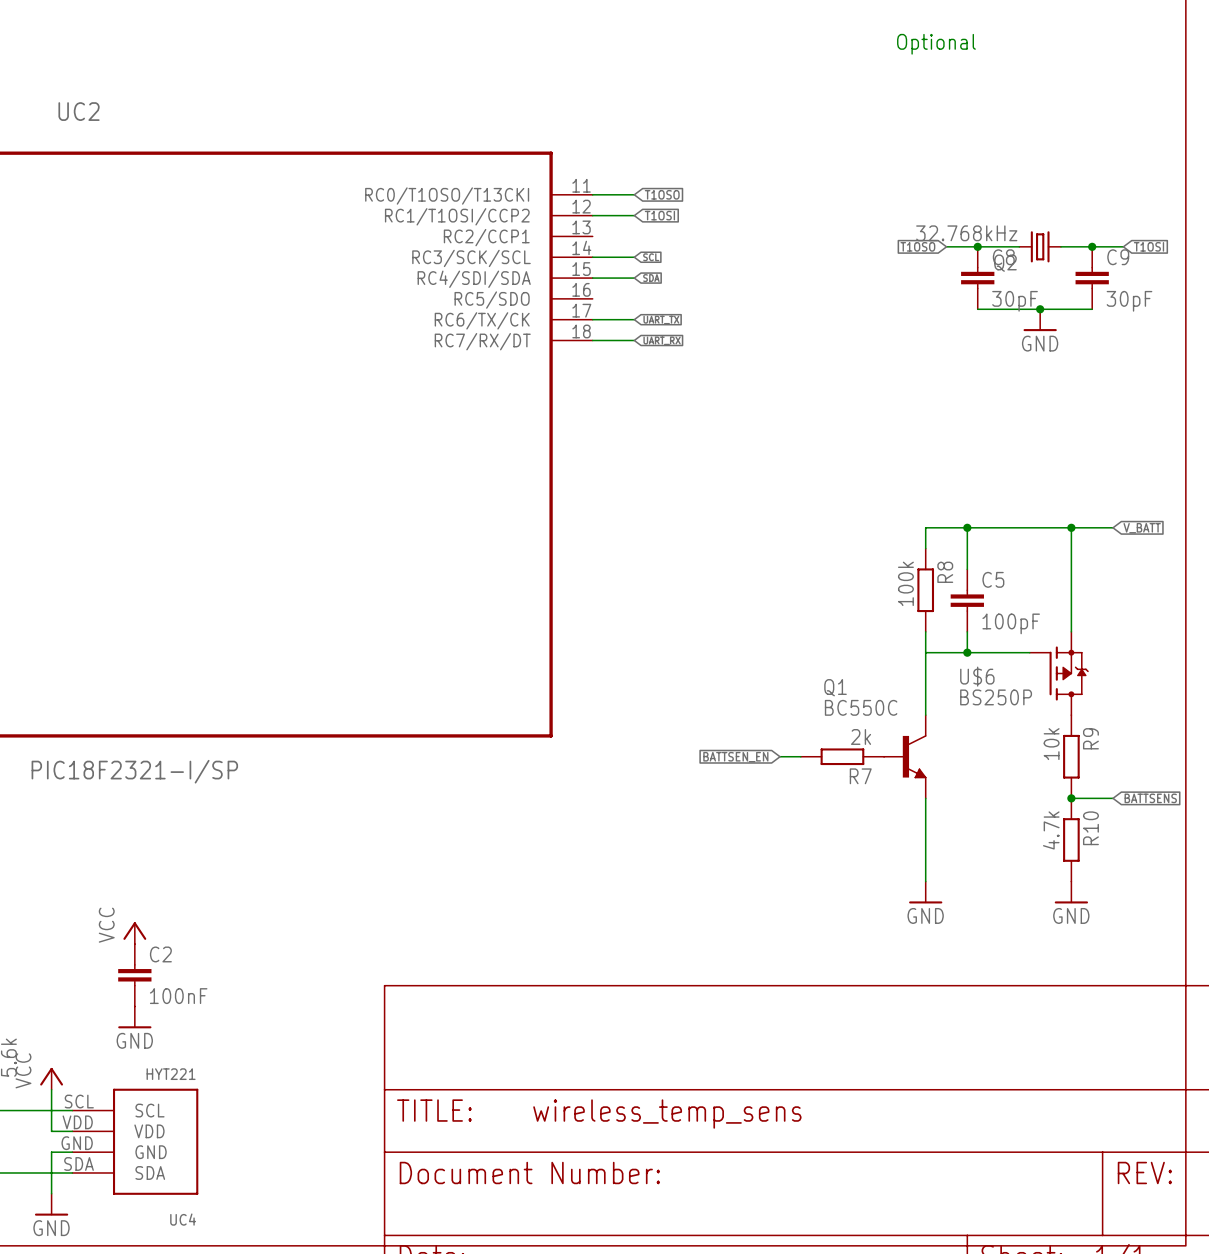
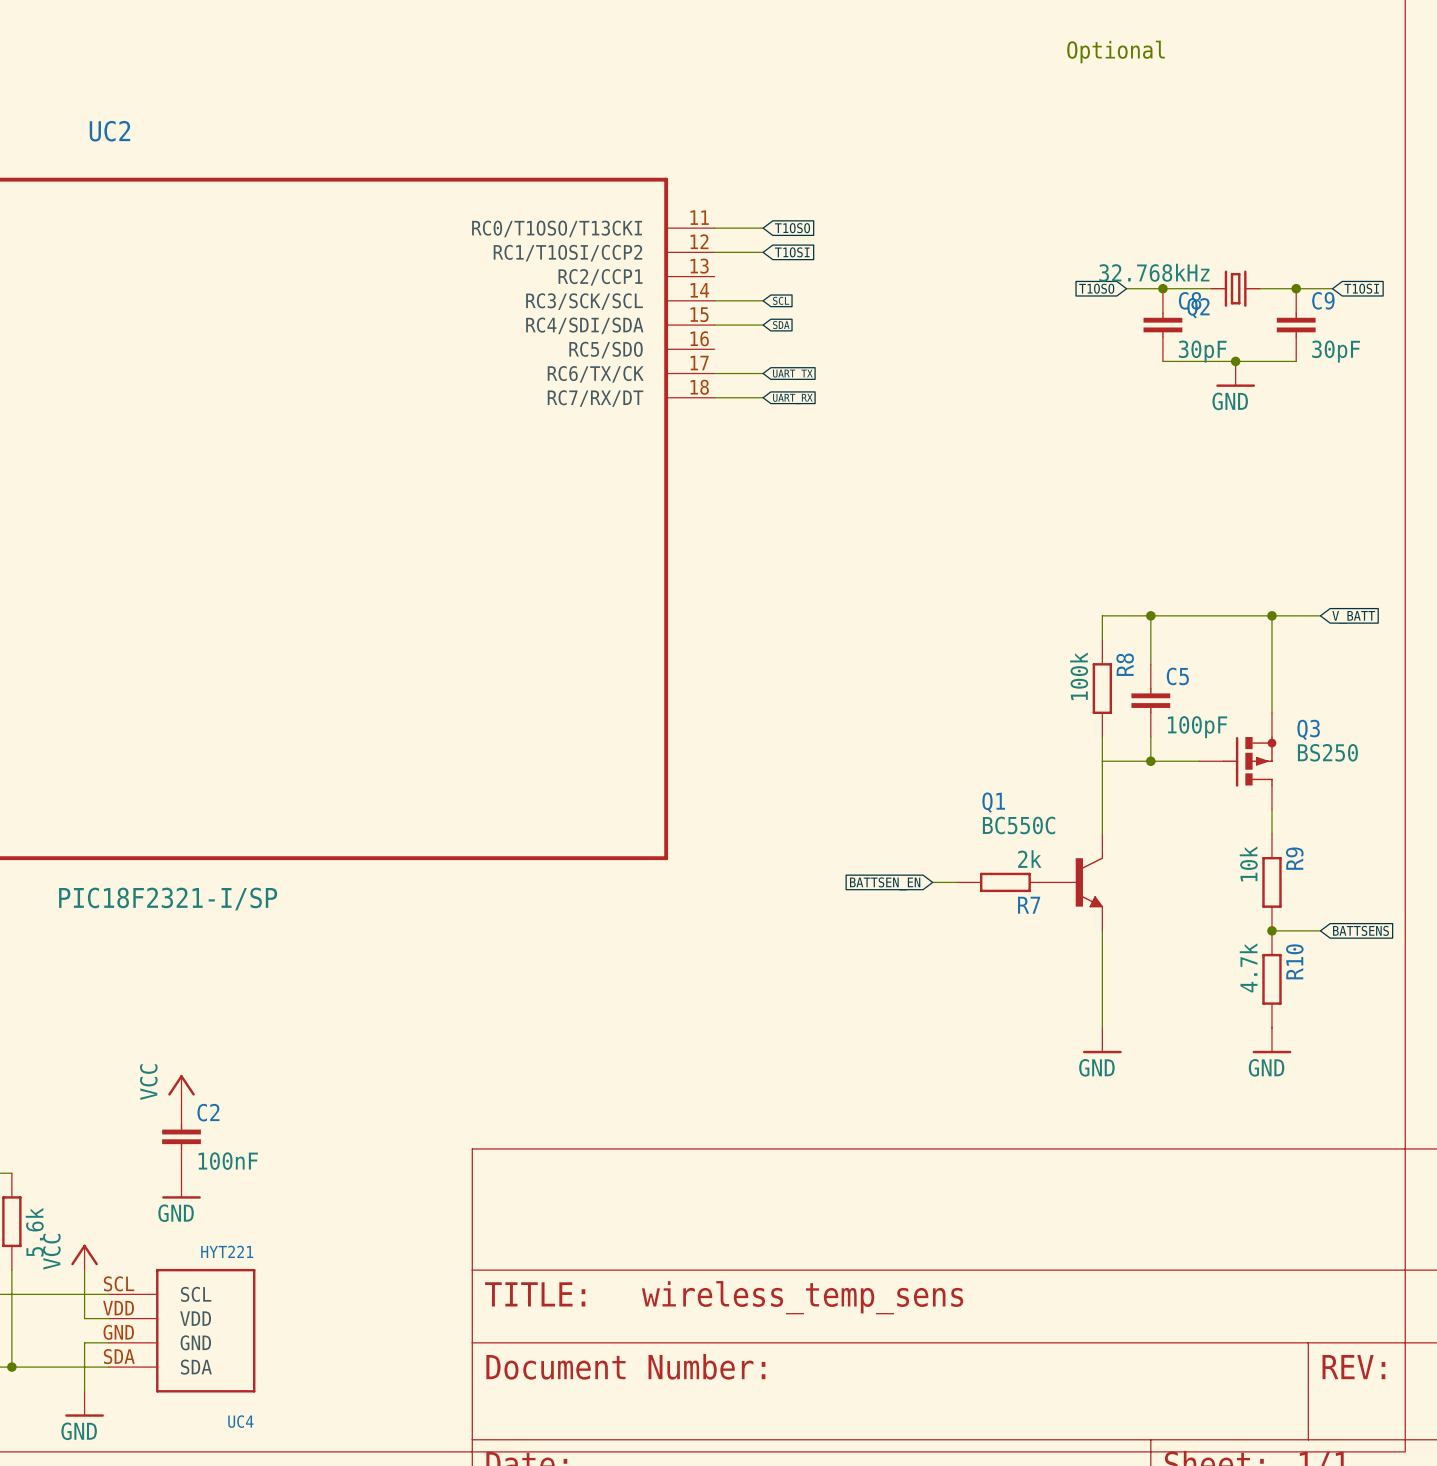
Q3: none -> BS250 (1237, 761)
U$6: BS250P (1059, 673) -> none

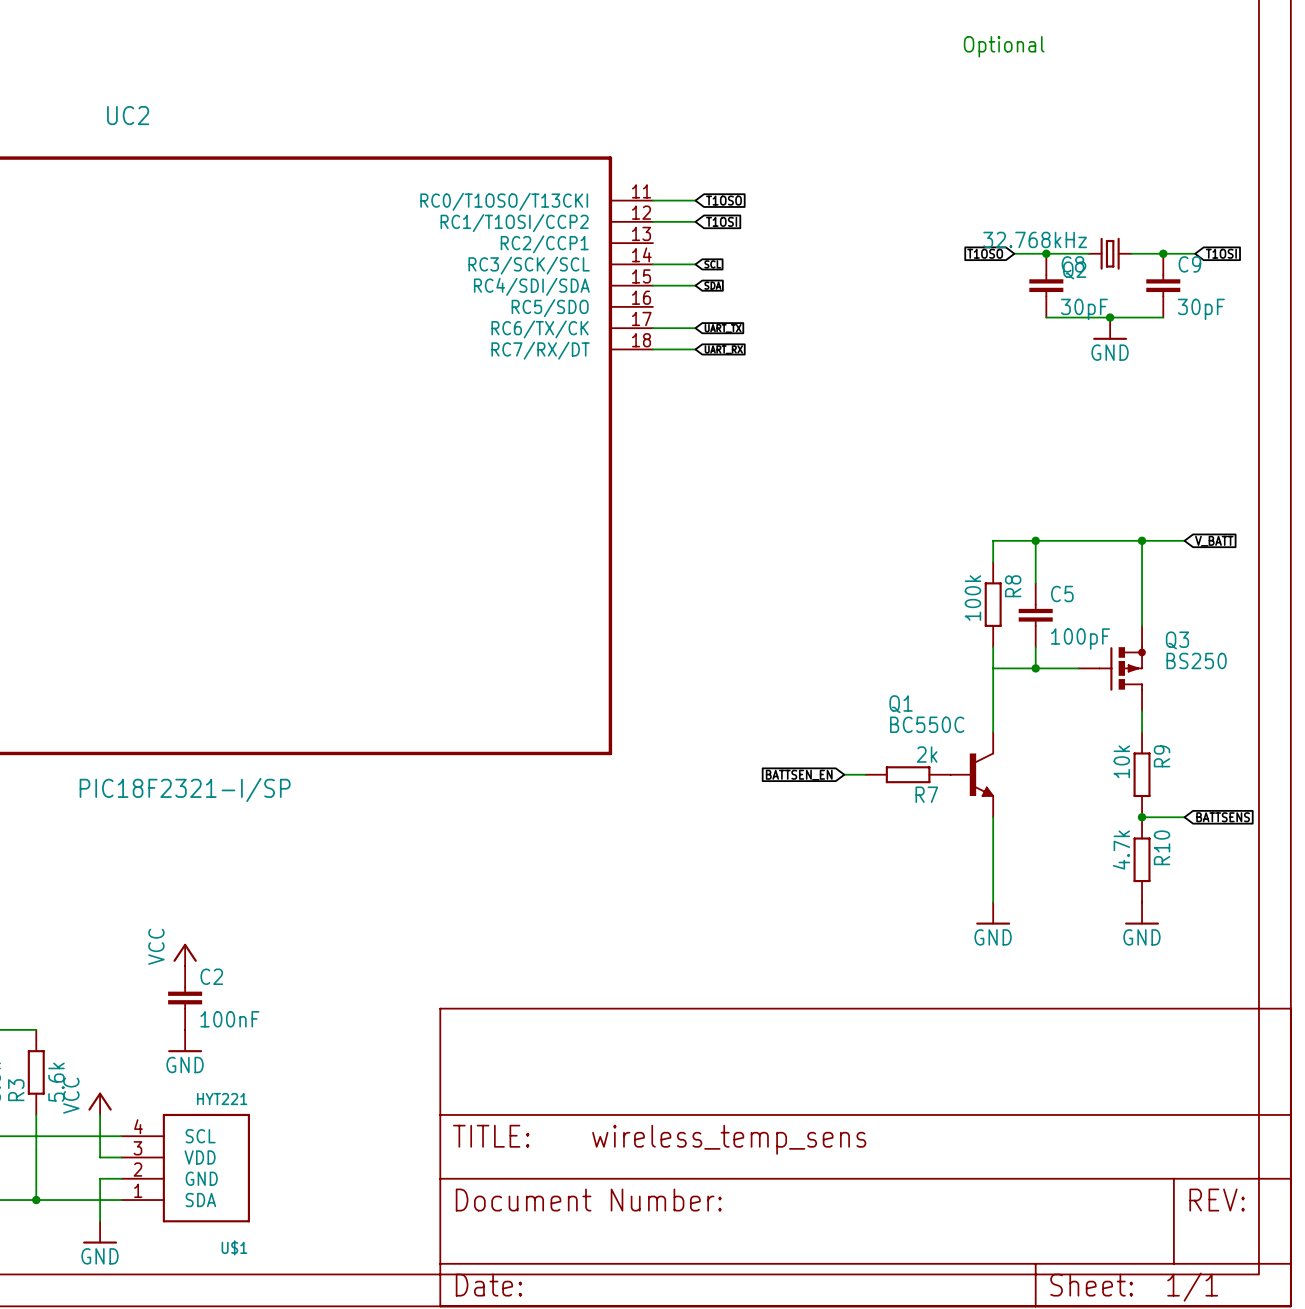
UC4 pin number: SCL (119, 1283) -> 4 (138, 1126)
UC4 pin number: VDD (118, 1308) -> 3 (137, 1148)
UC4 pin number: GND (118, 1332) -> 2 (137, 1169)
UC4 pin number: SDA (119, 1356) -> 1 (138, 1190)
UC4 name: UC4 (240, 1421) -> U$1 (234, 1247)

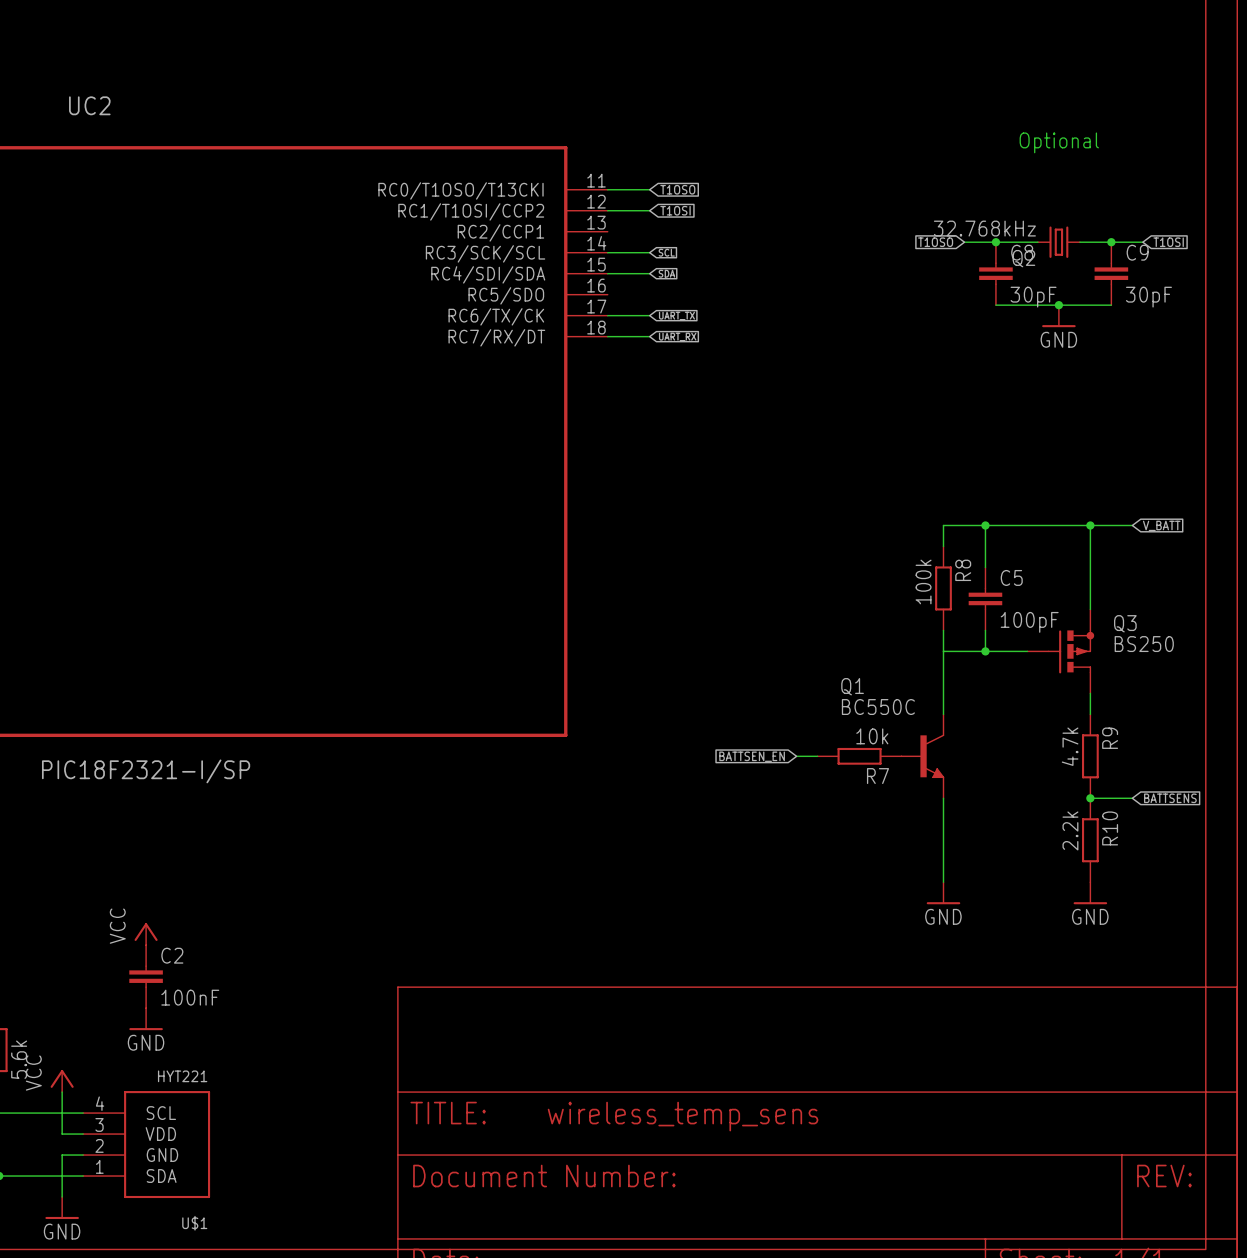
text position: Optional (1004, 46) -> Optional (1059, 142)
R7 value: 2k (927, 754) -> 10k (872, 736)
R9 value: 10k (1121, 761) -> 4.7k (1070, 746)
R10 value: 4.7k (1121, 850) -> 2.2k (1070, 830)

